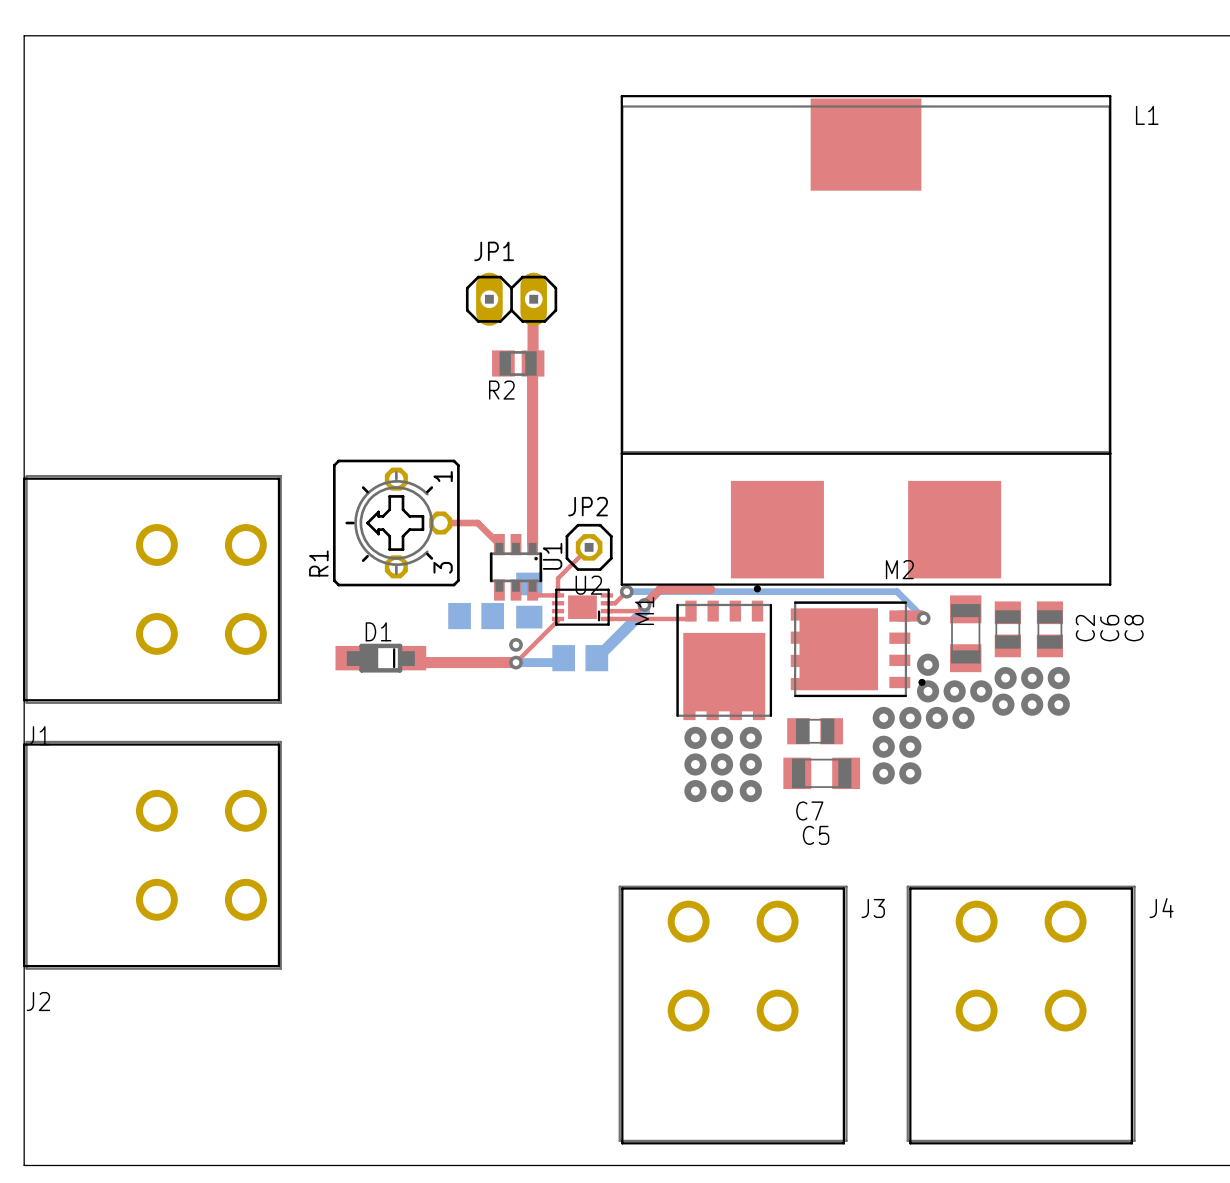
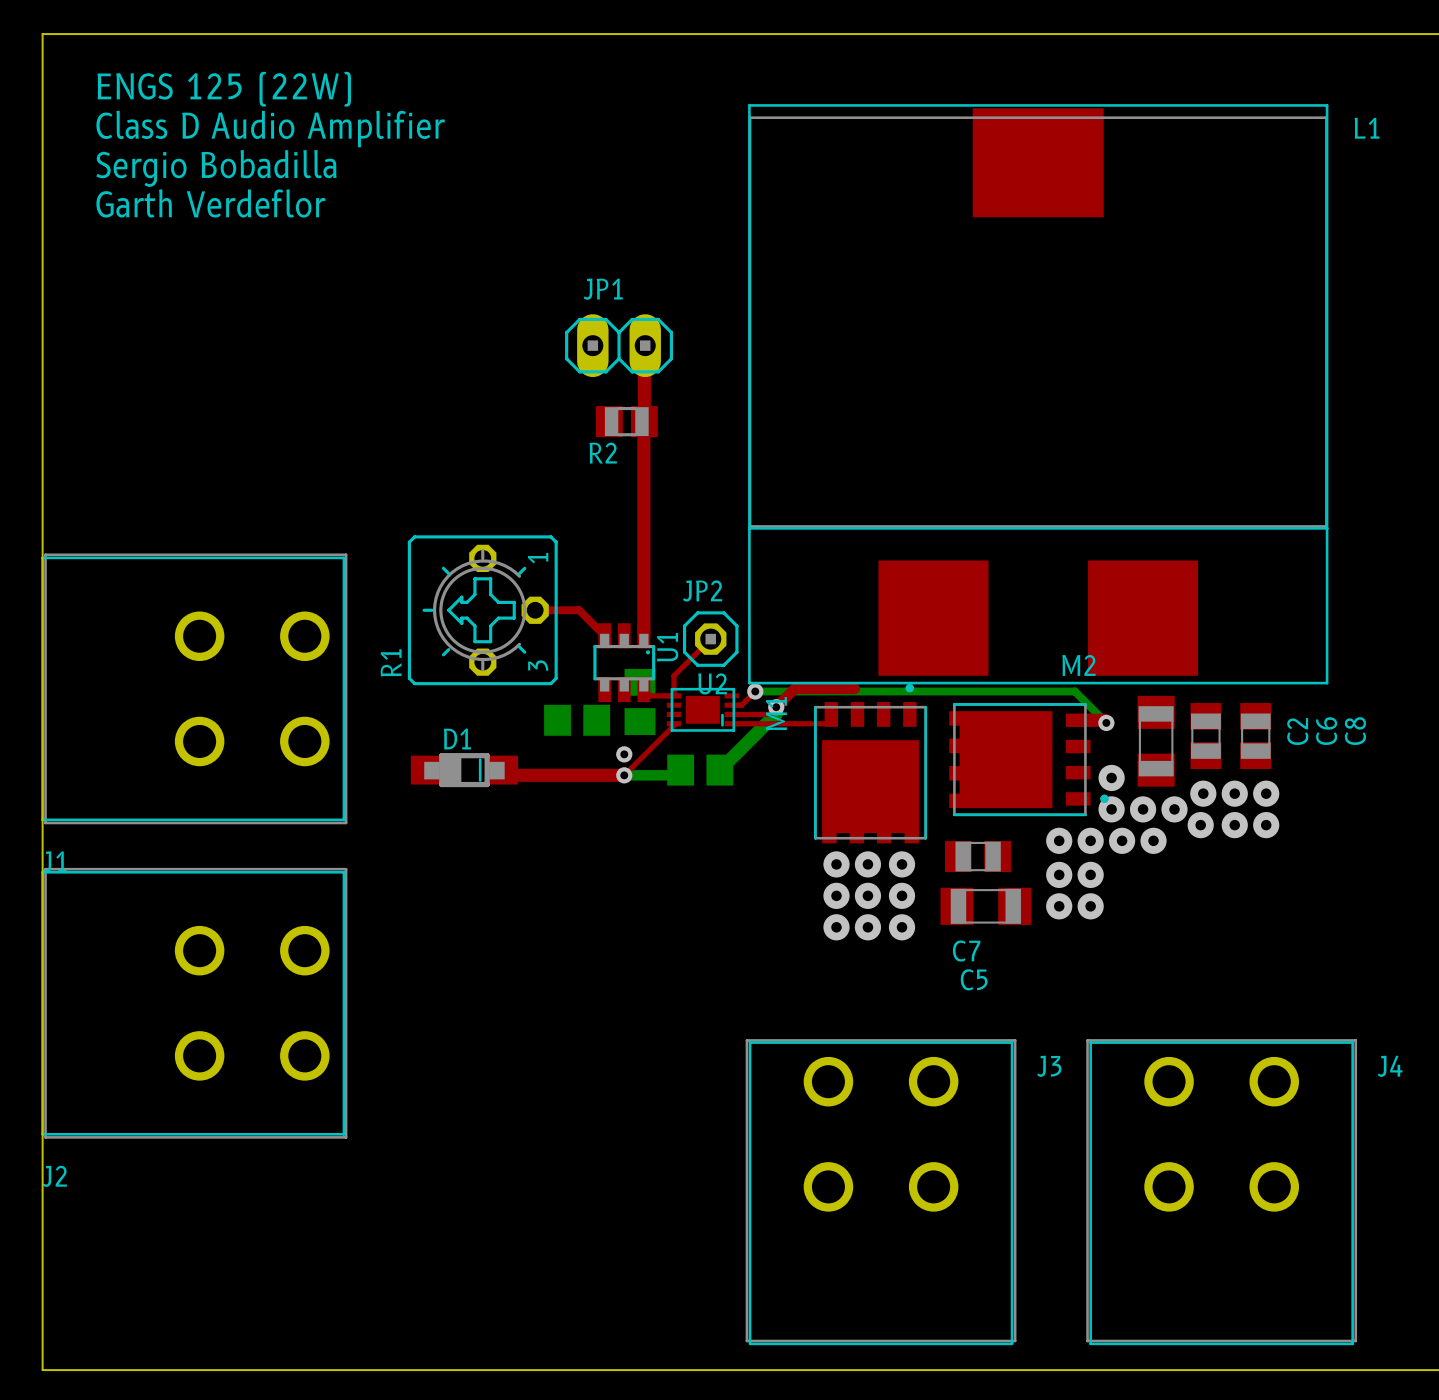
text: none -> ENGS 125 (22W) (224, 89)
text: none -> Class D Audio Amplifier (270, 129)
text: none -> Sergio Bobadilla (216, 168)
text: none -> Garth Verdeflor (210, 203)

